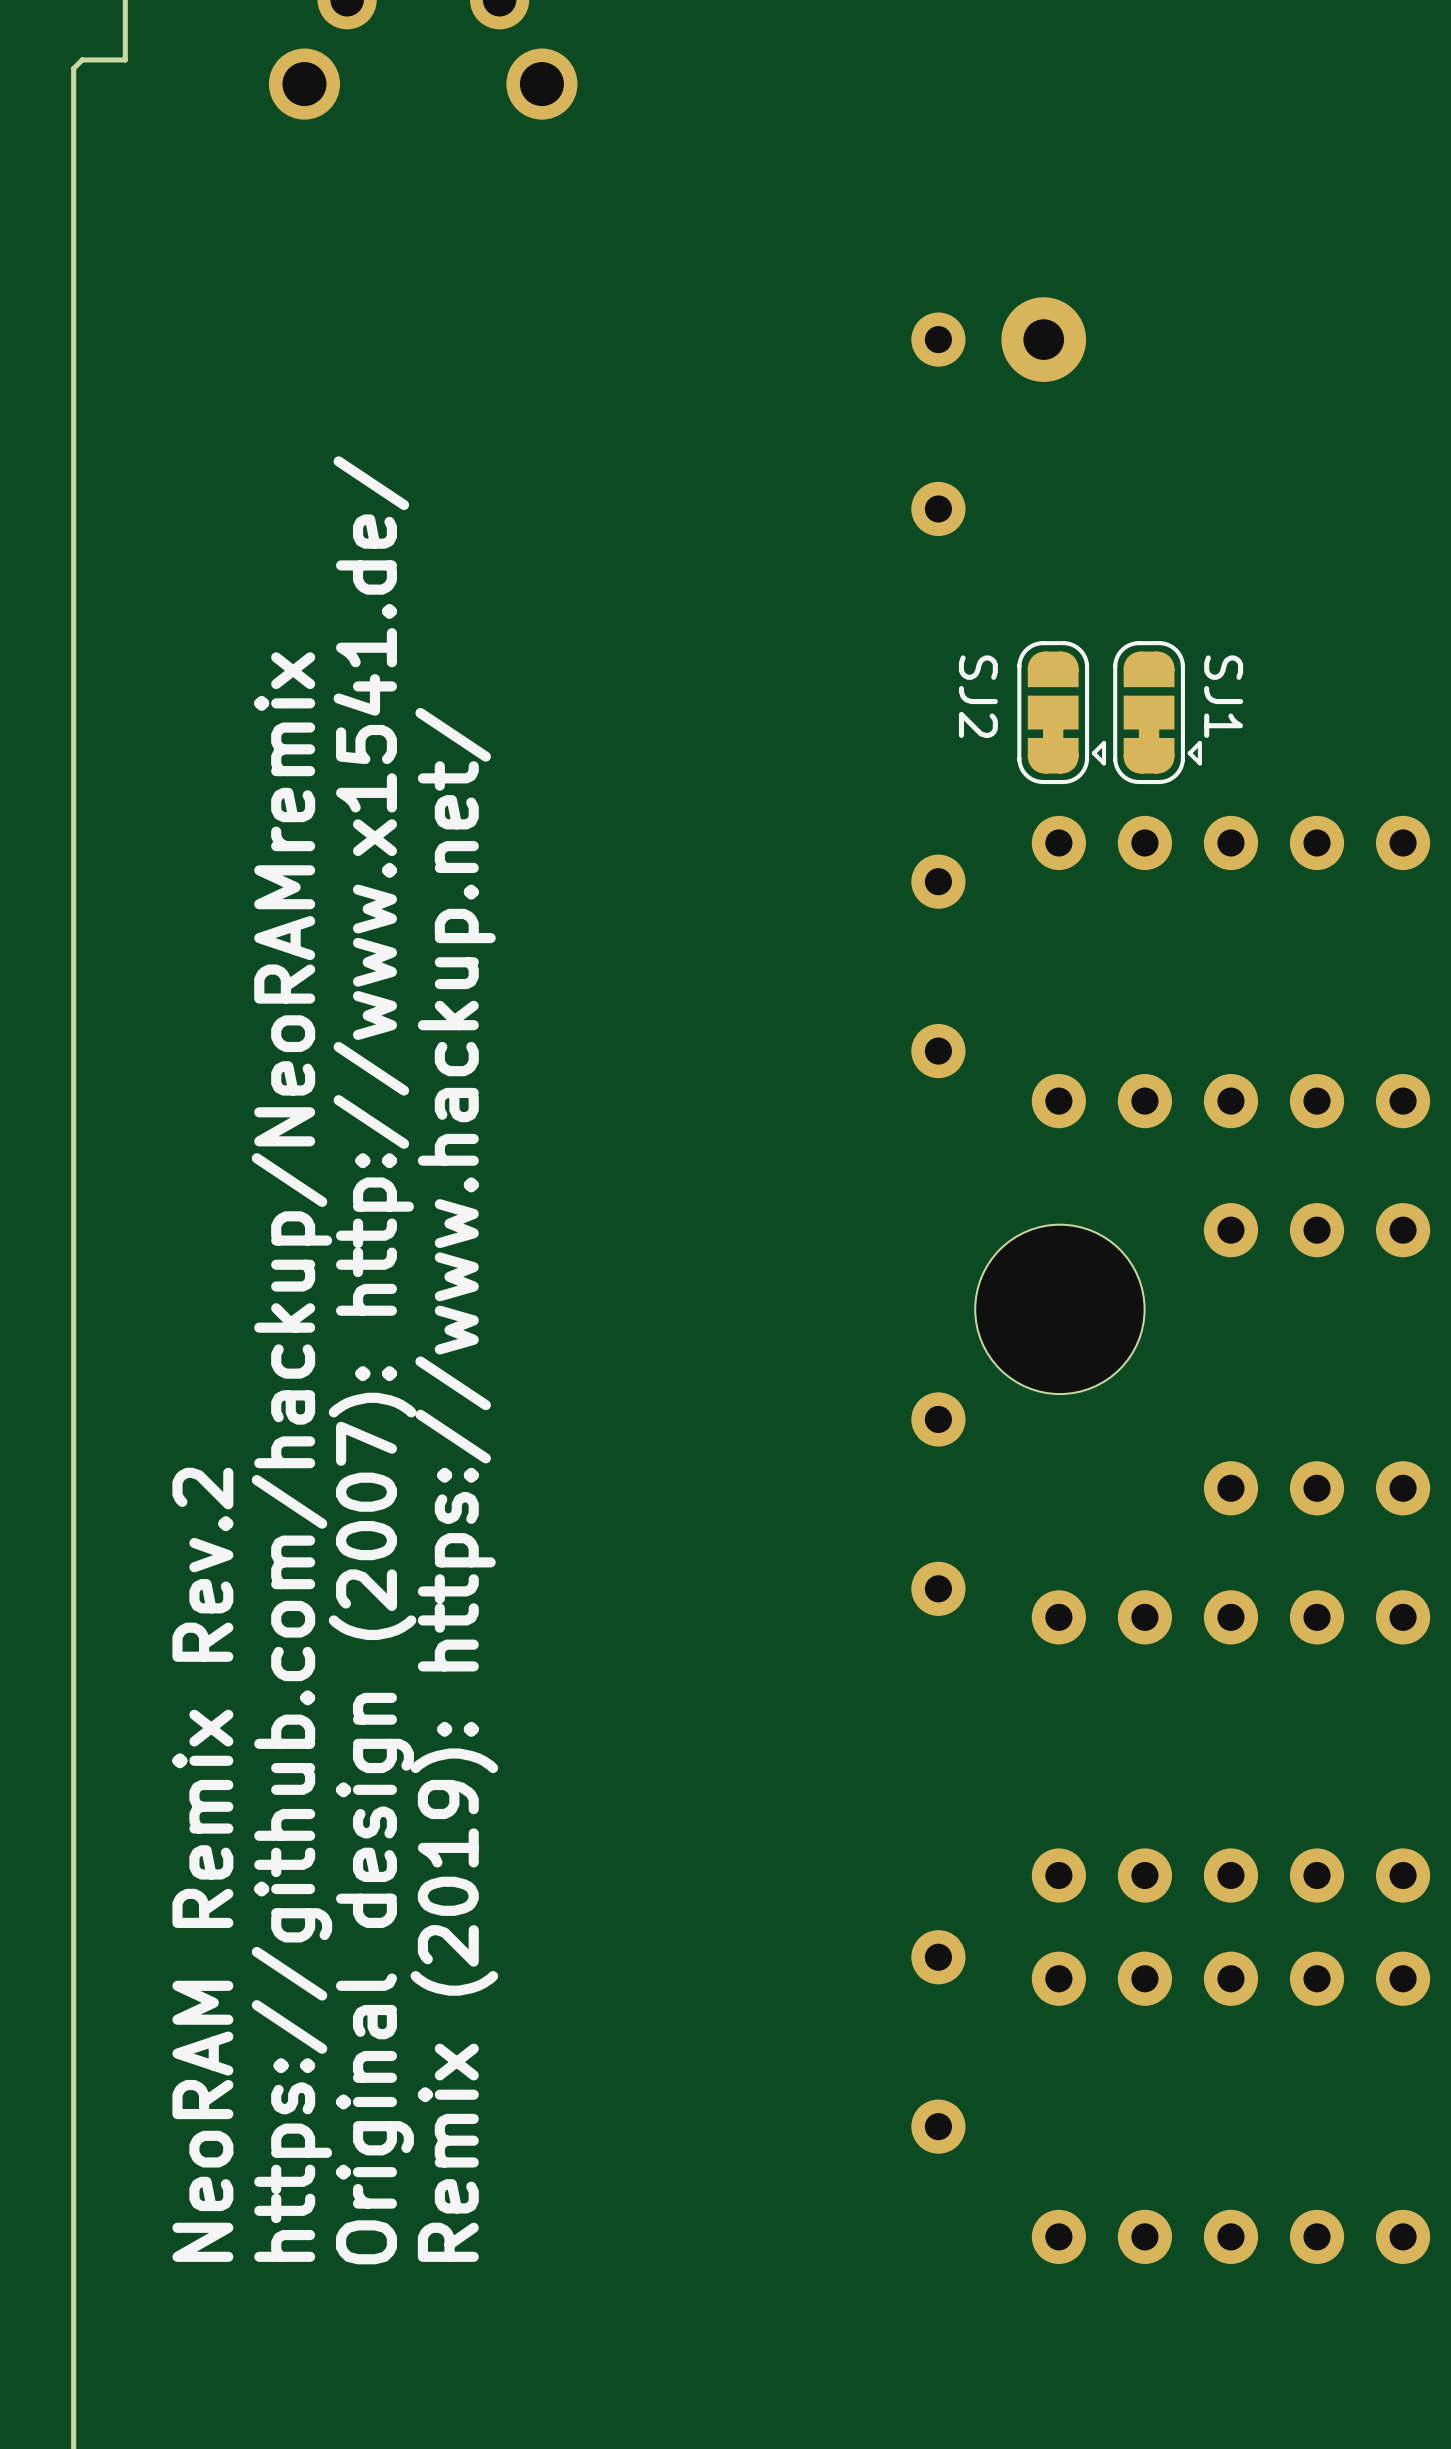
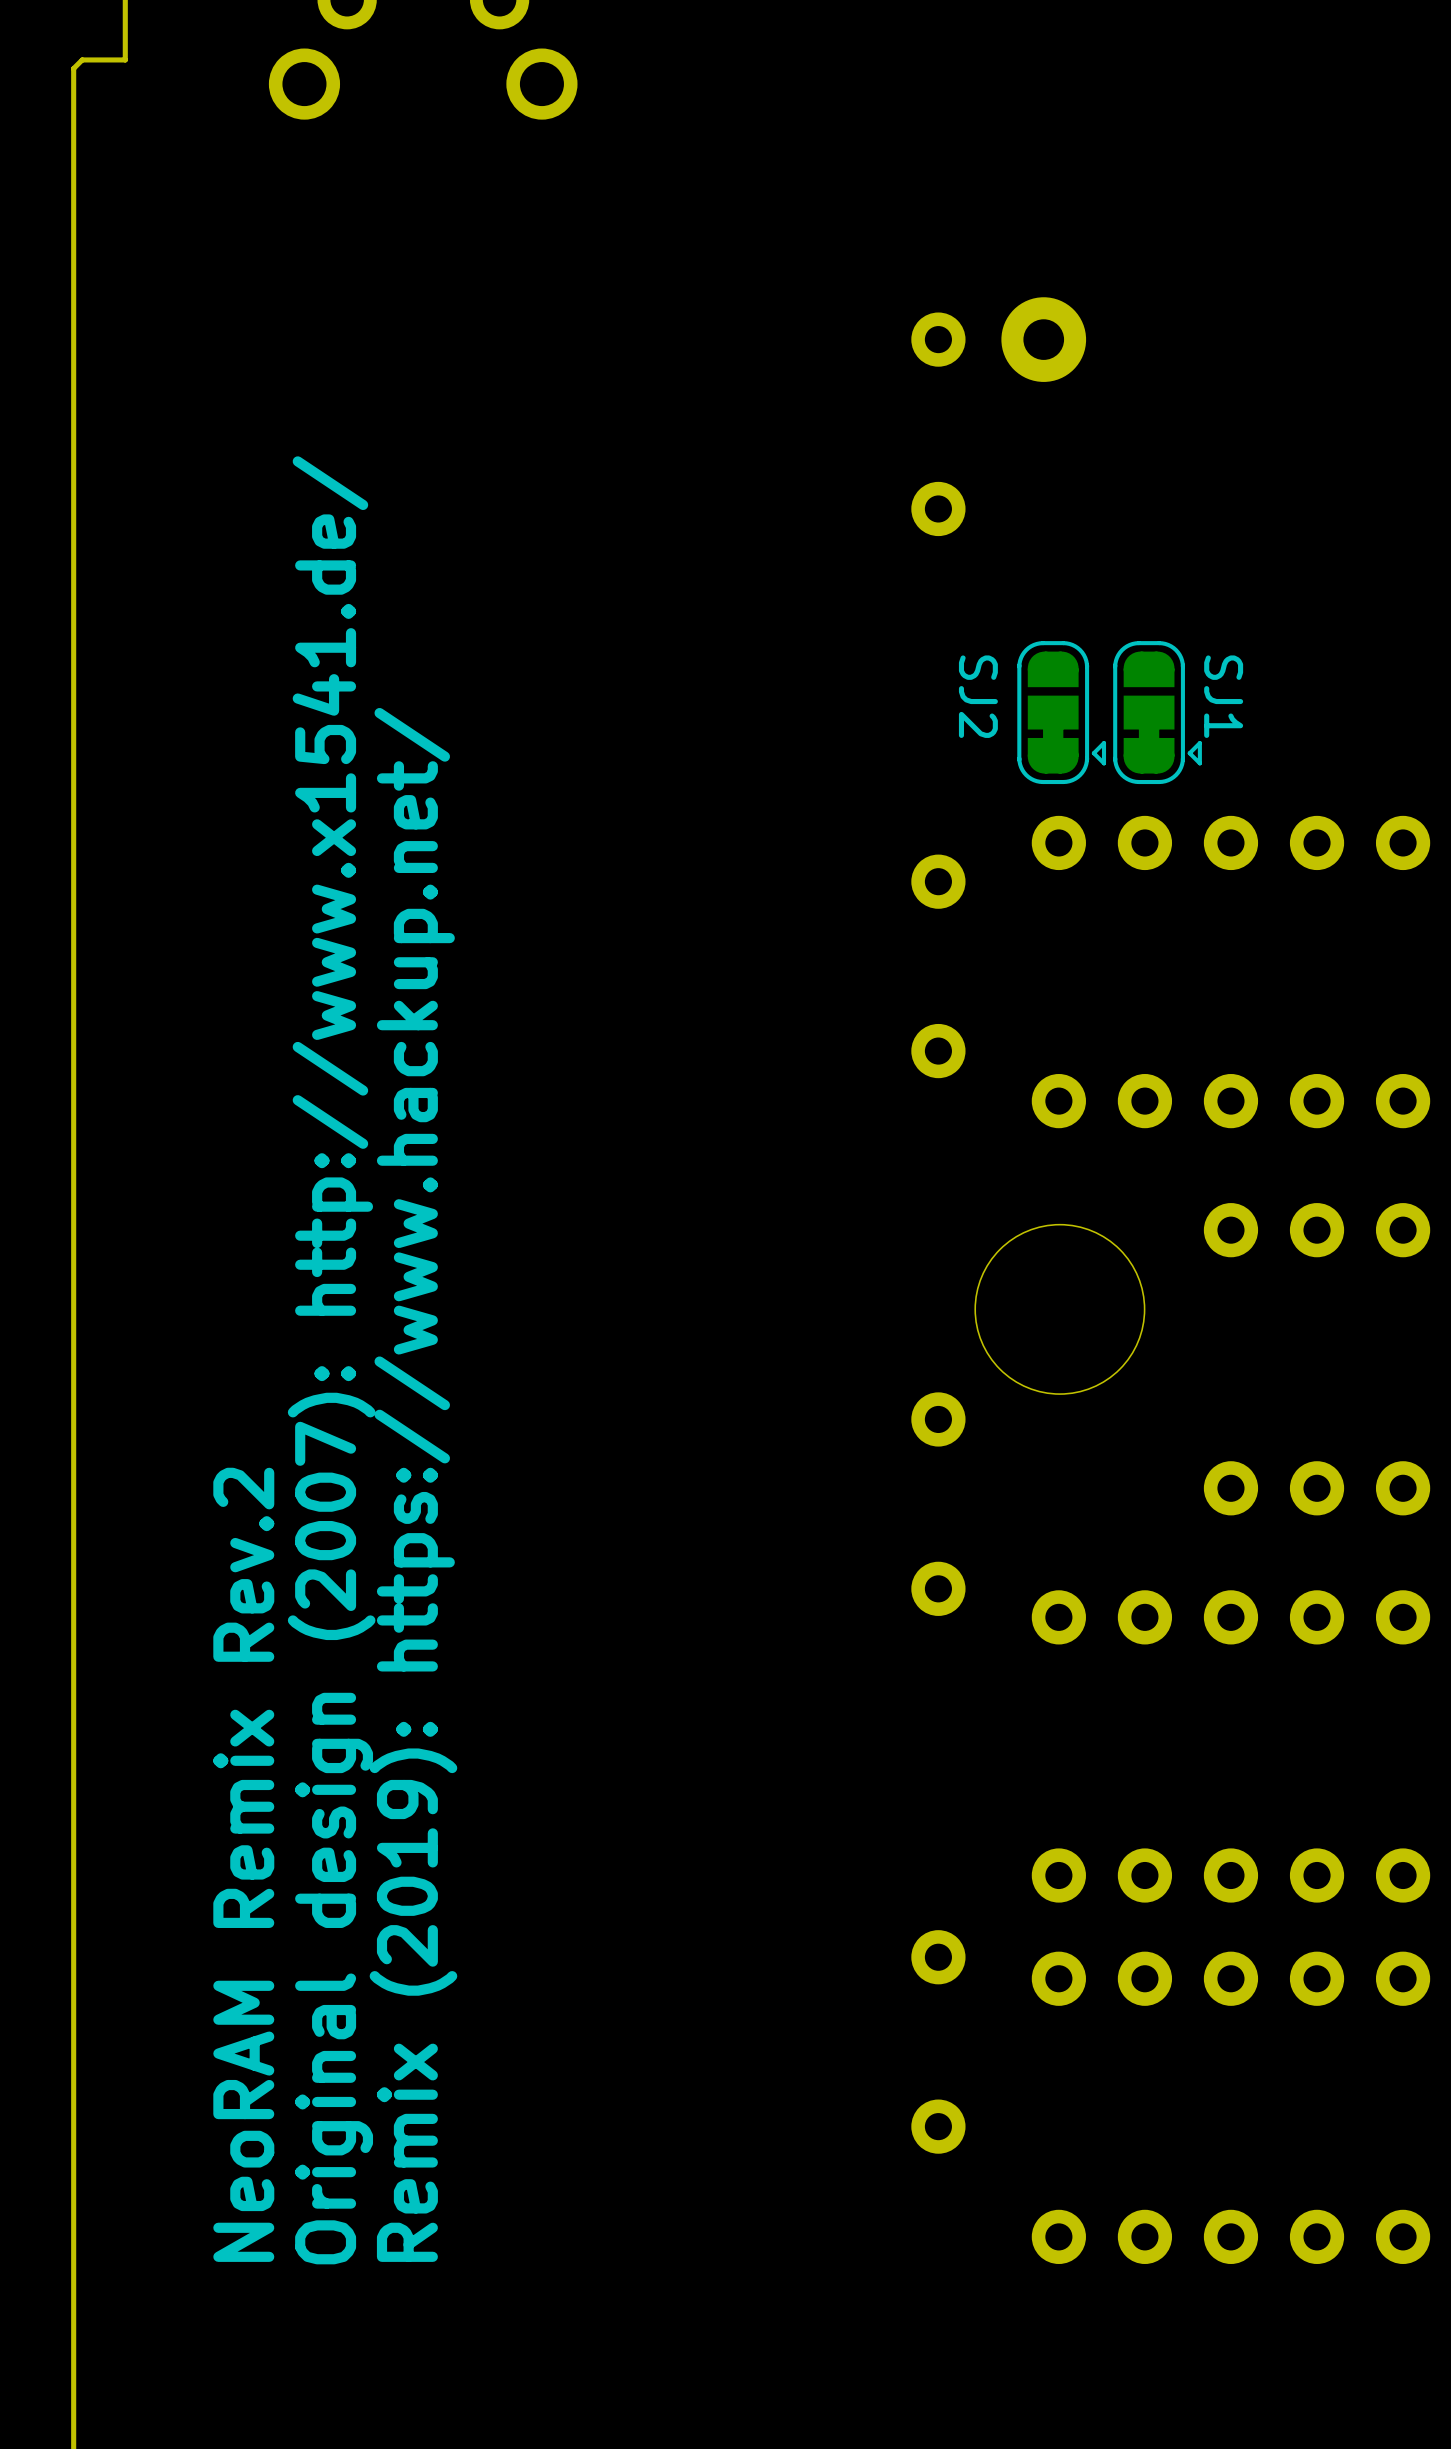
text position: Original design (2007): http://www.x1541.de/ (372, 1360) -> Original design (2007): http://www.x1541.de/ (331, 1360)
text: https://github.com/hackup/NeoRAMremix (291, 1457) -> none
text position: Remix (2019): https://www.hackup.net/ (454, 1484) -> Remix (2019): https://www.hackup.net/ (413, 1484)
text position: NeoRAM Remix Rev.2 (202, 1864) -> NeoRAM Remix Rev.2 (243, 1864)

